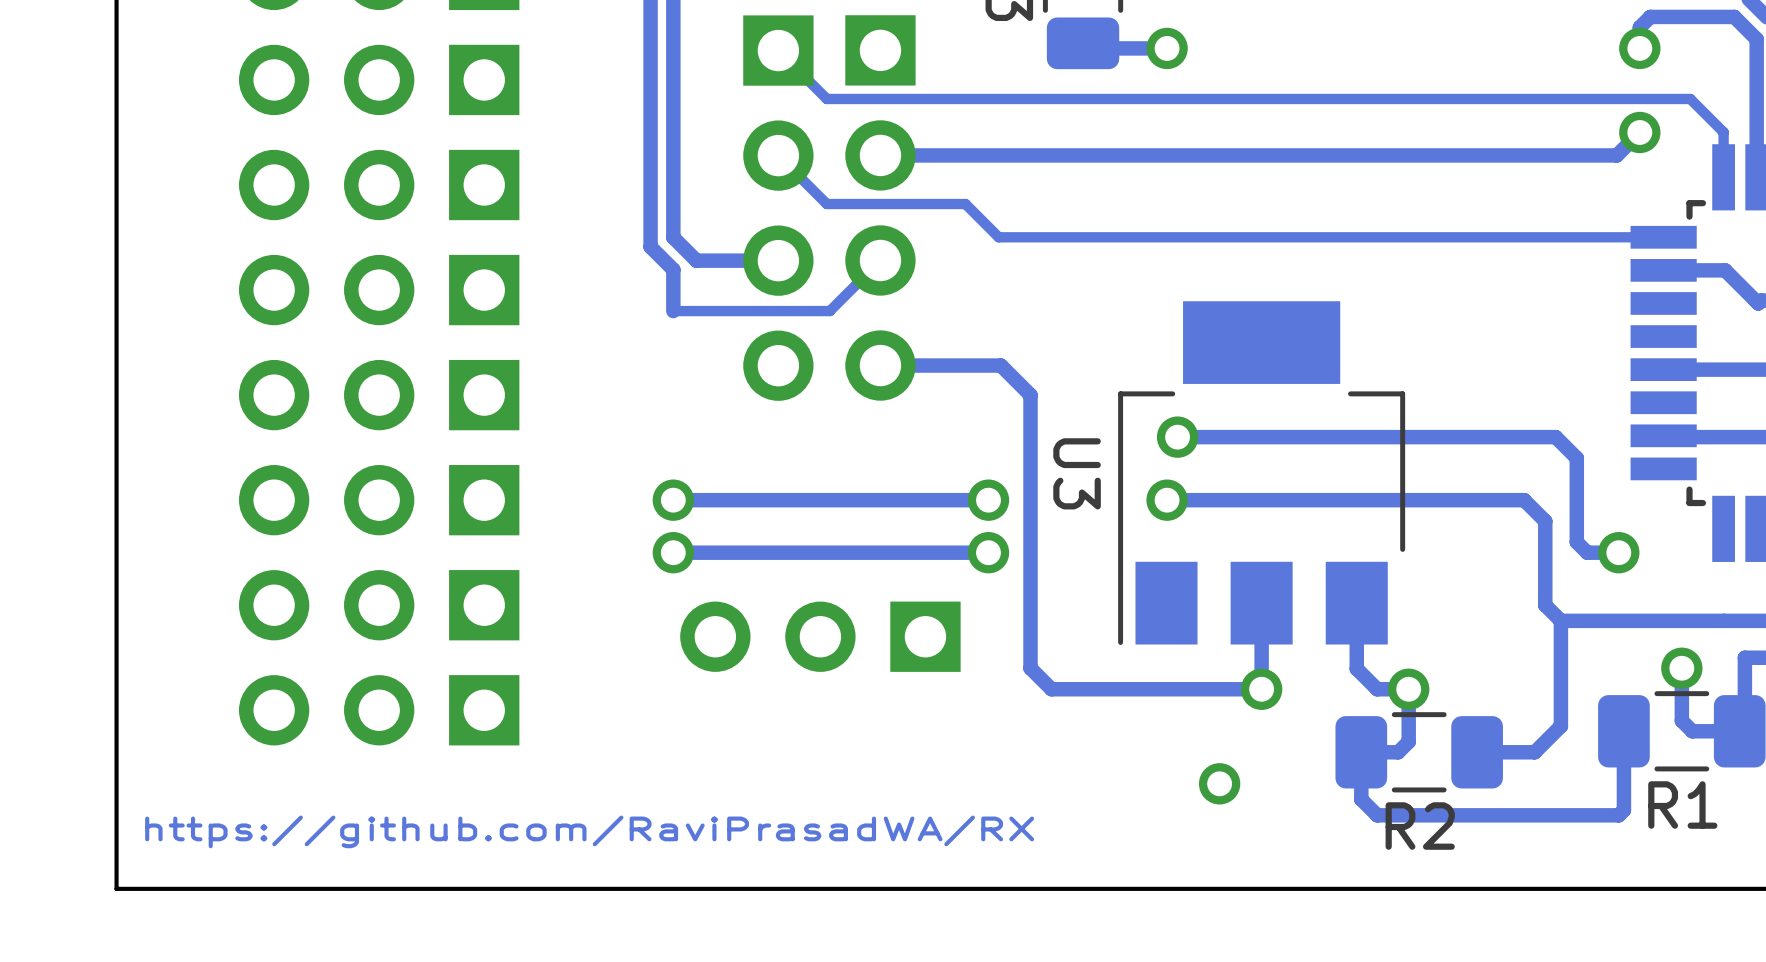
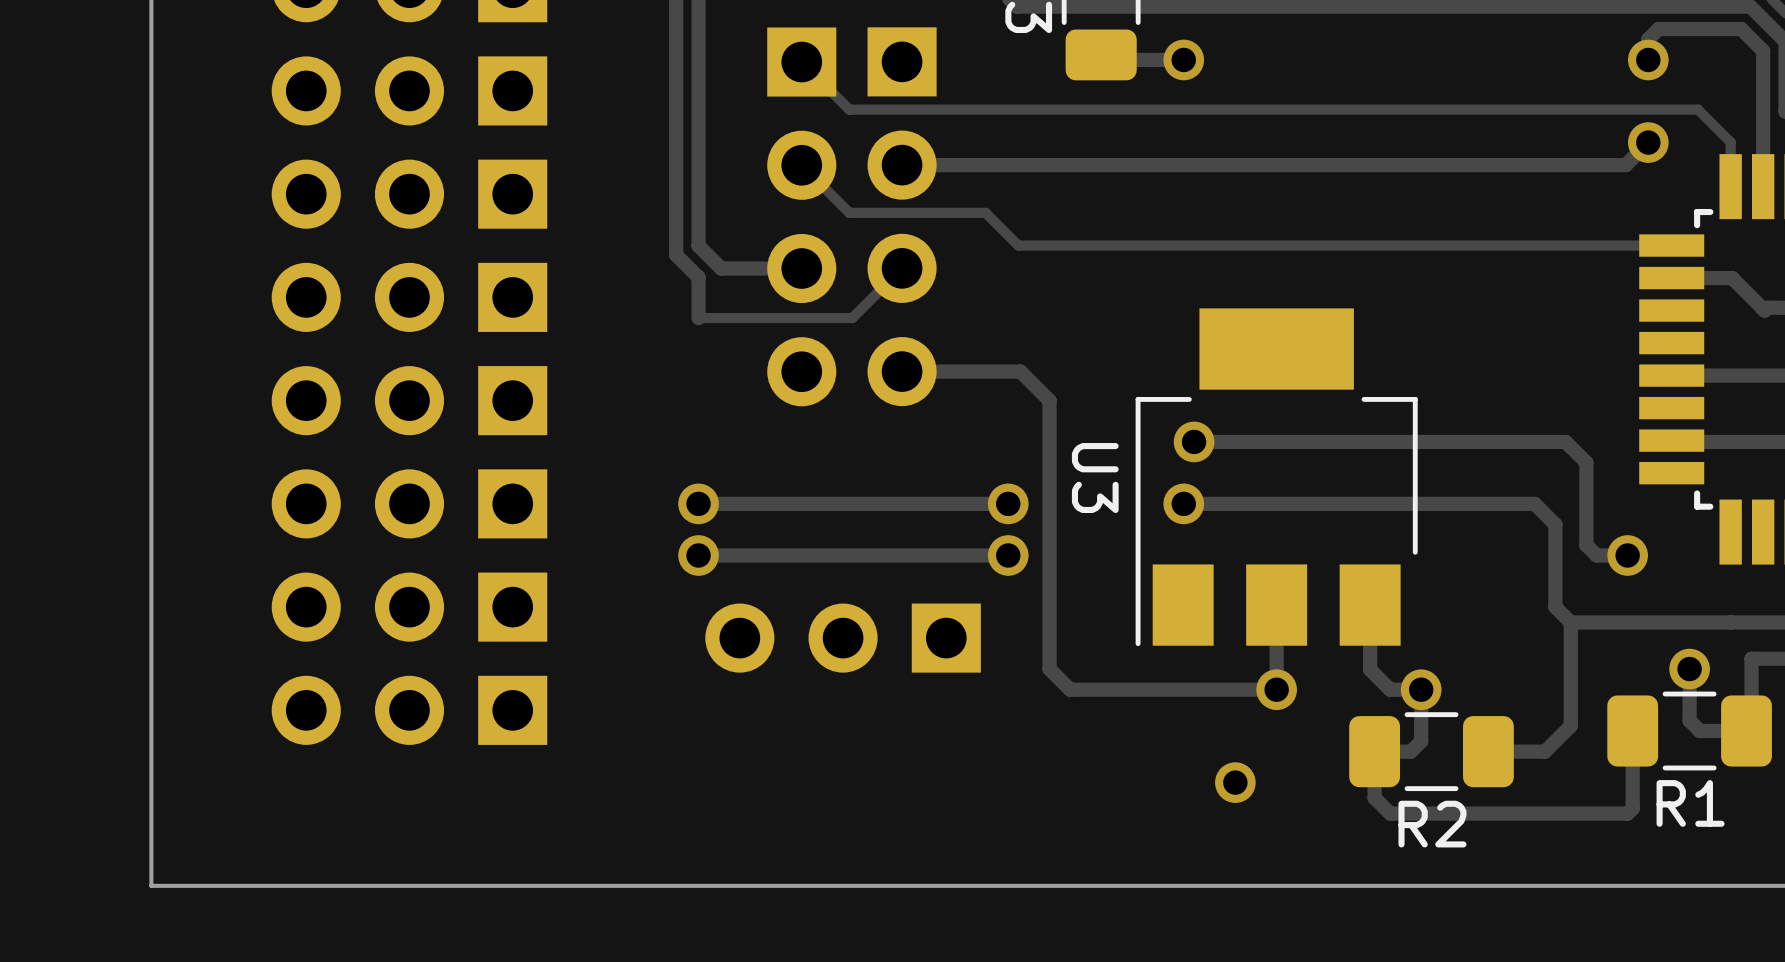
text: https://github.com/RaviPrasadWA/RX (589, 831) -> none

